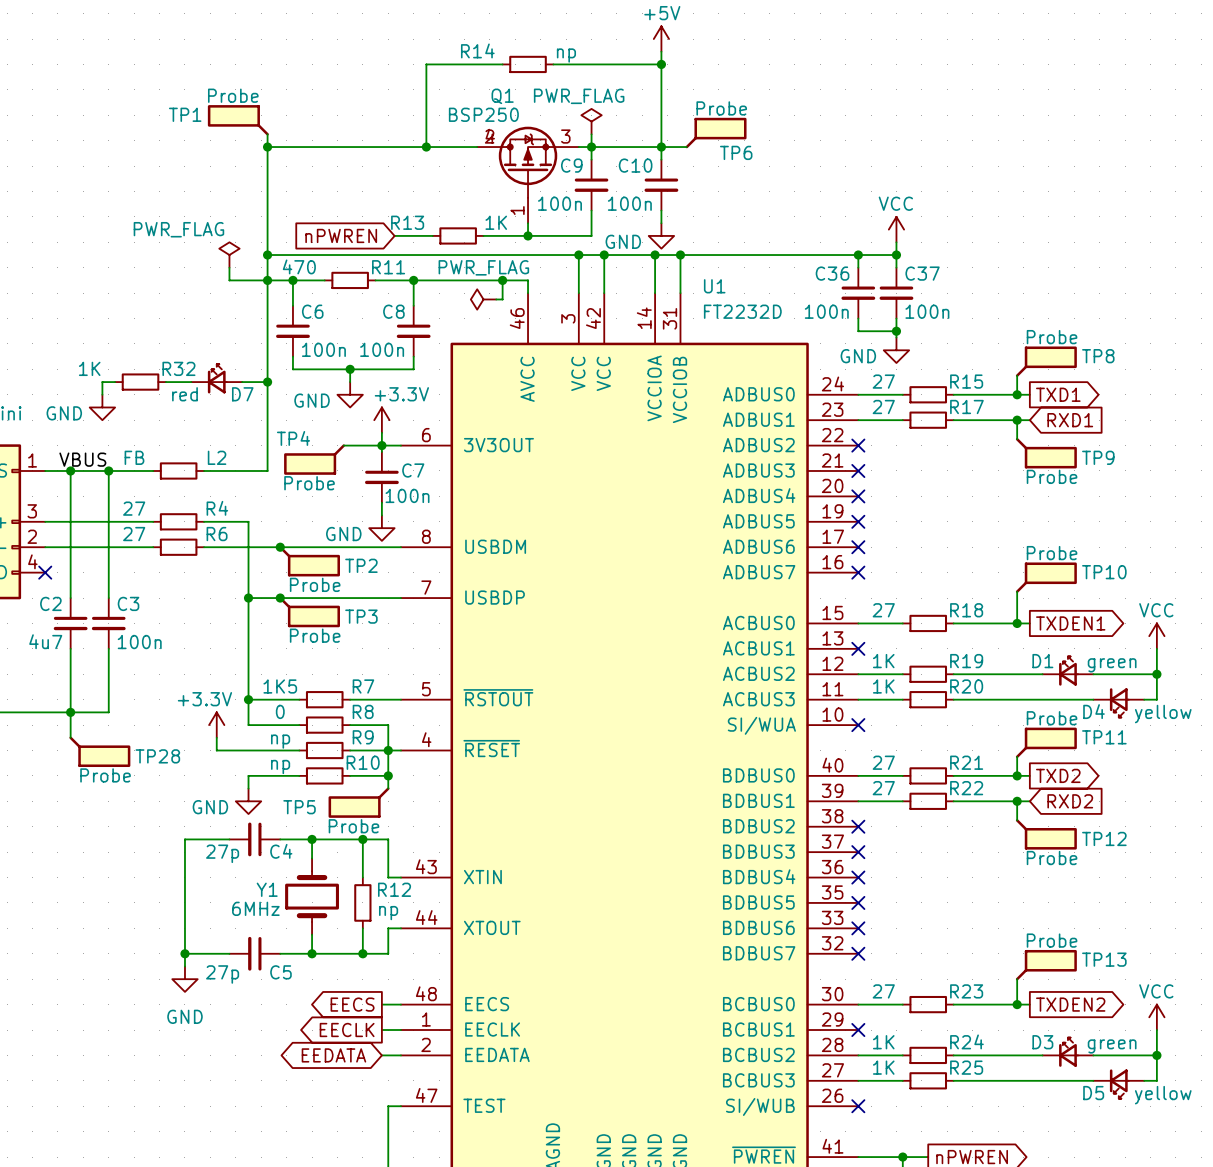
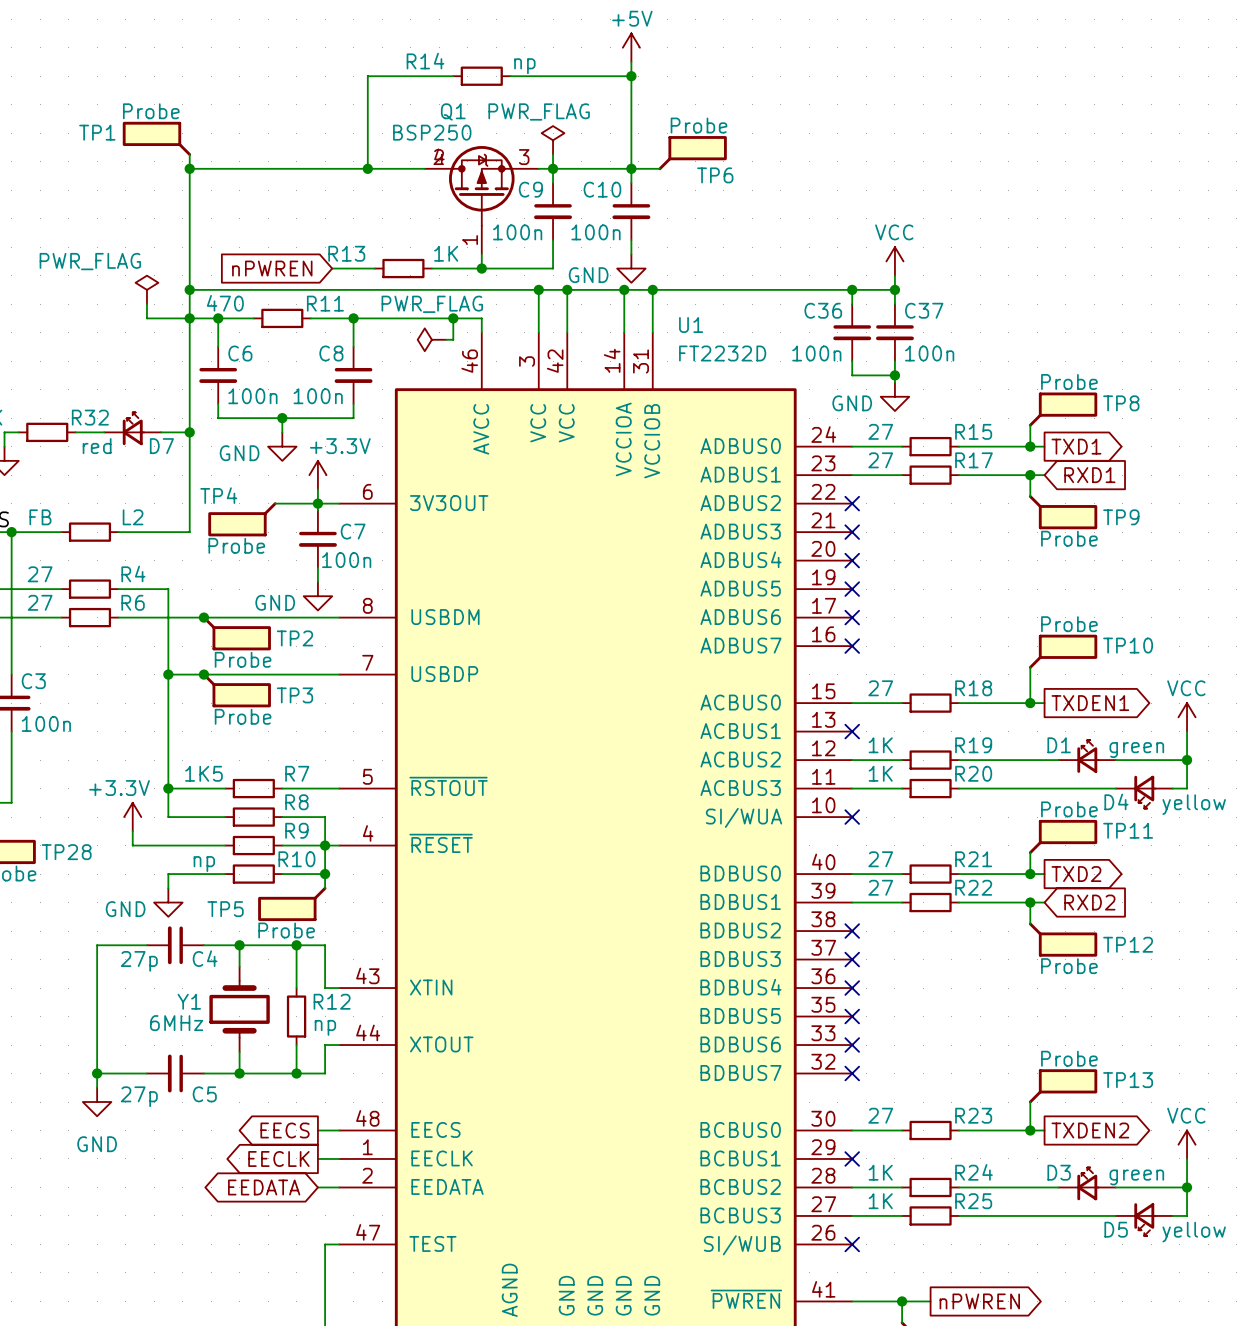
R8 value: 0 (280, 711) -> none
R9 value: np (280, 741) -> none

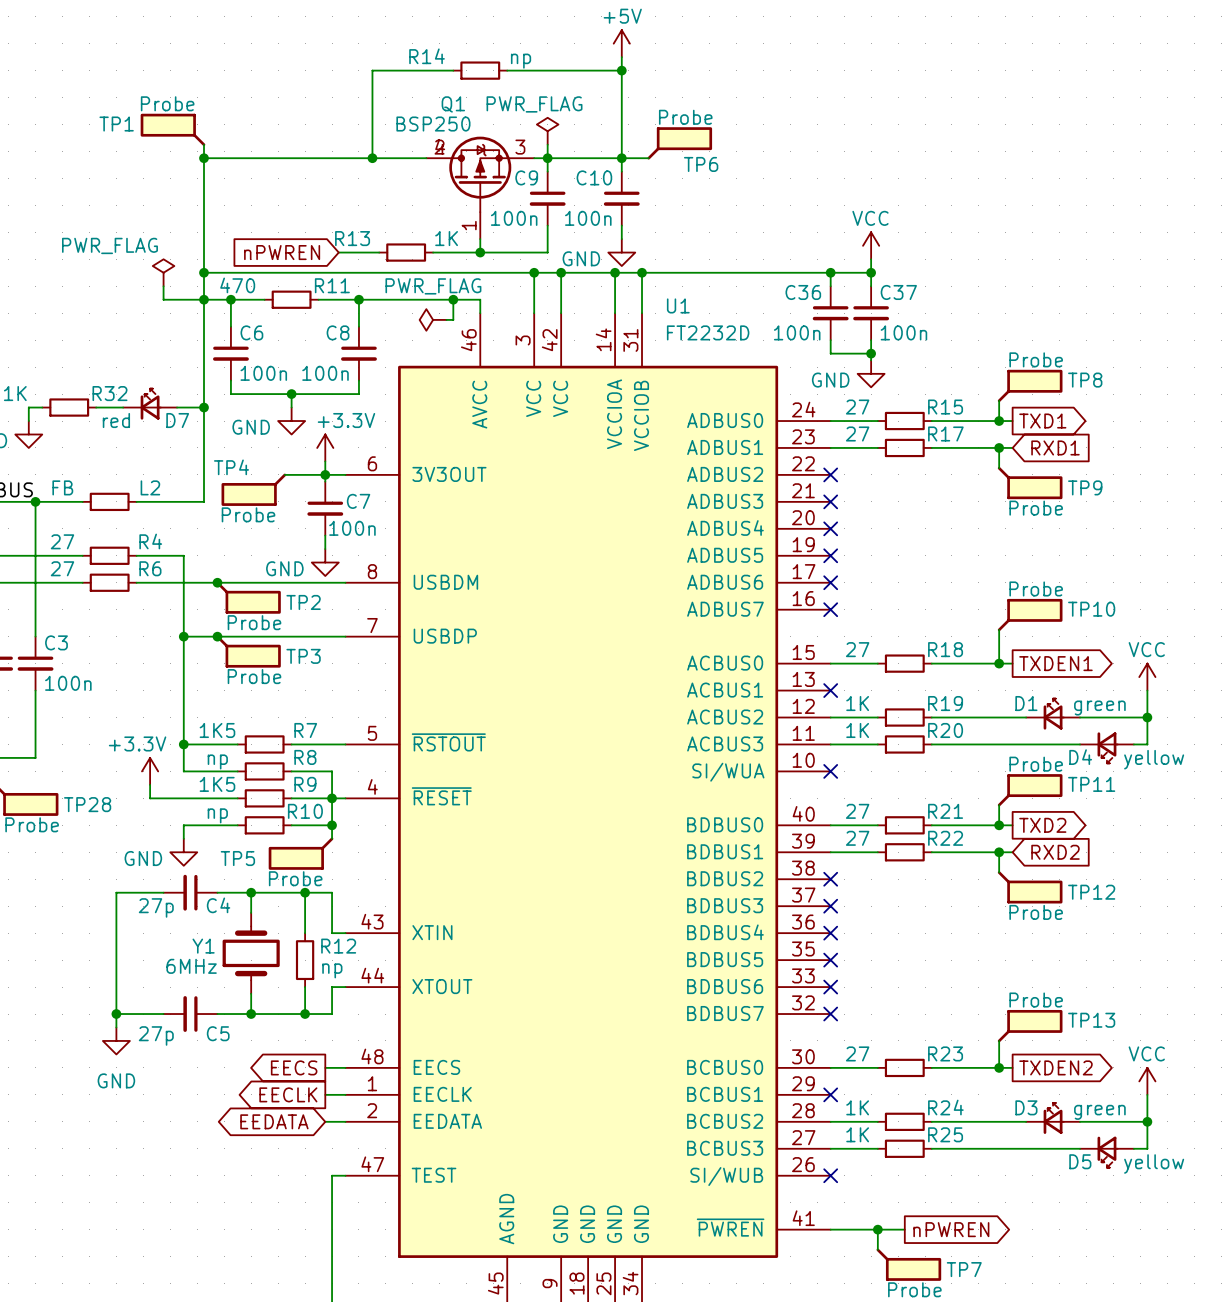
R8 value: none -> np (217, 761)
R9 value: none -> 1K5 (217, 784)

